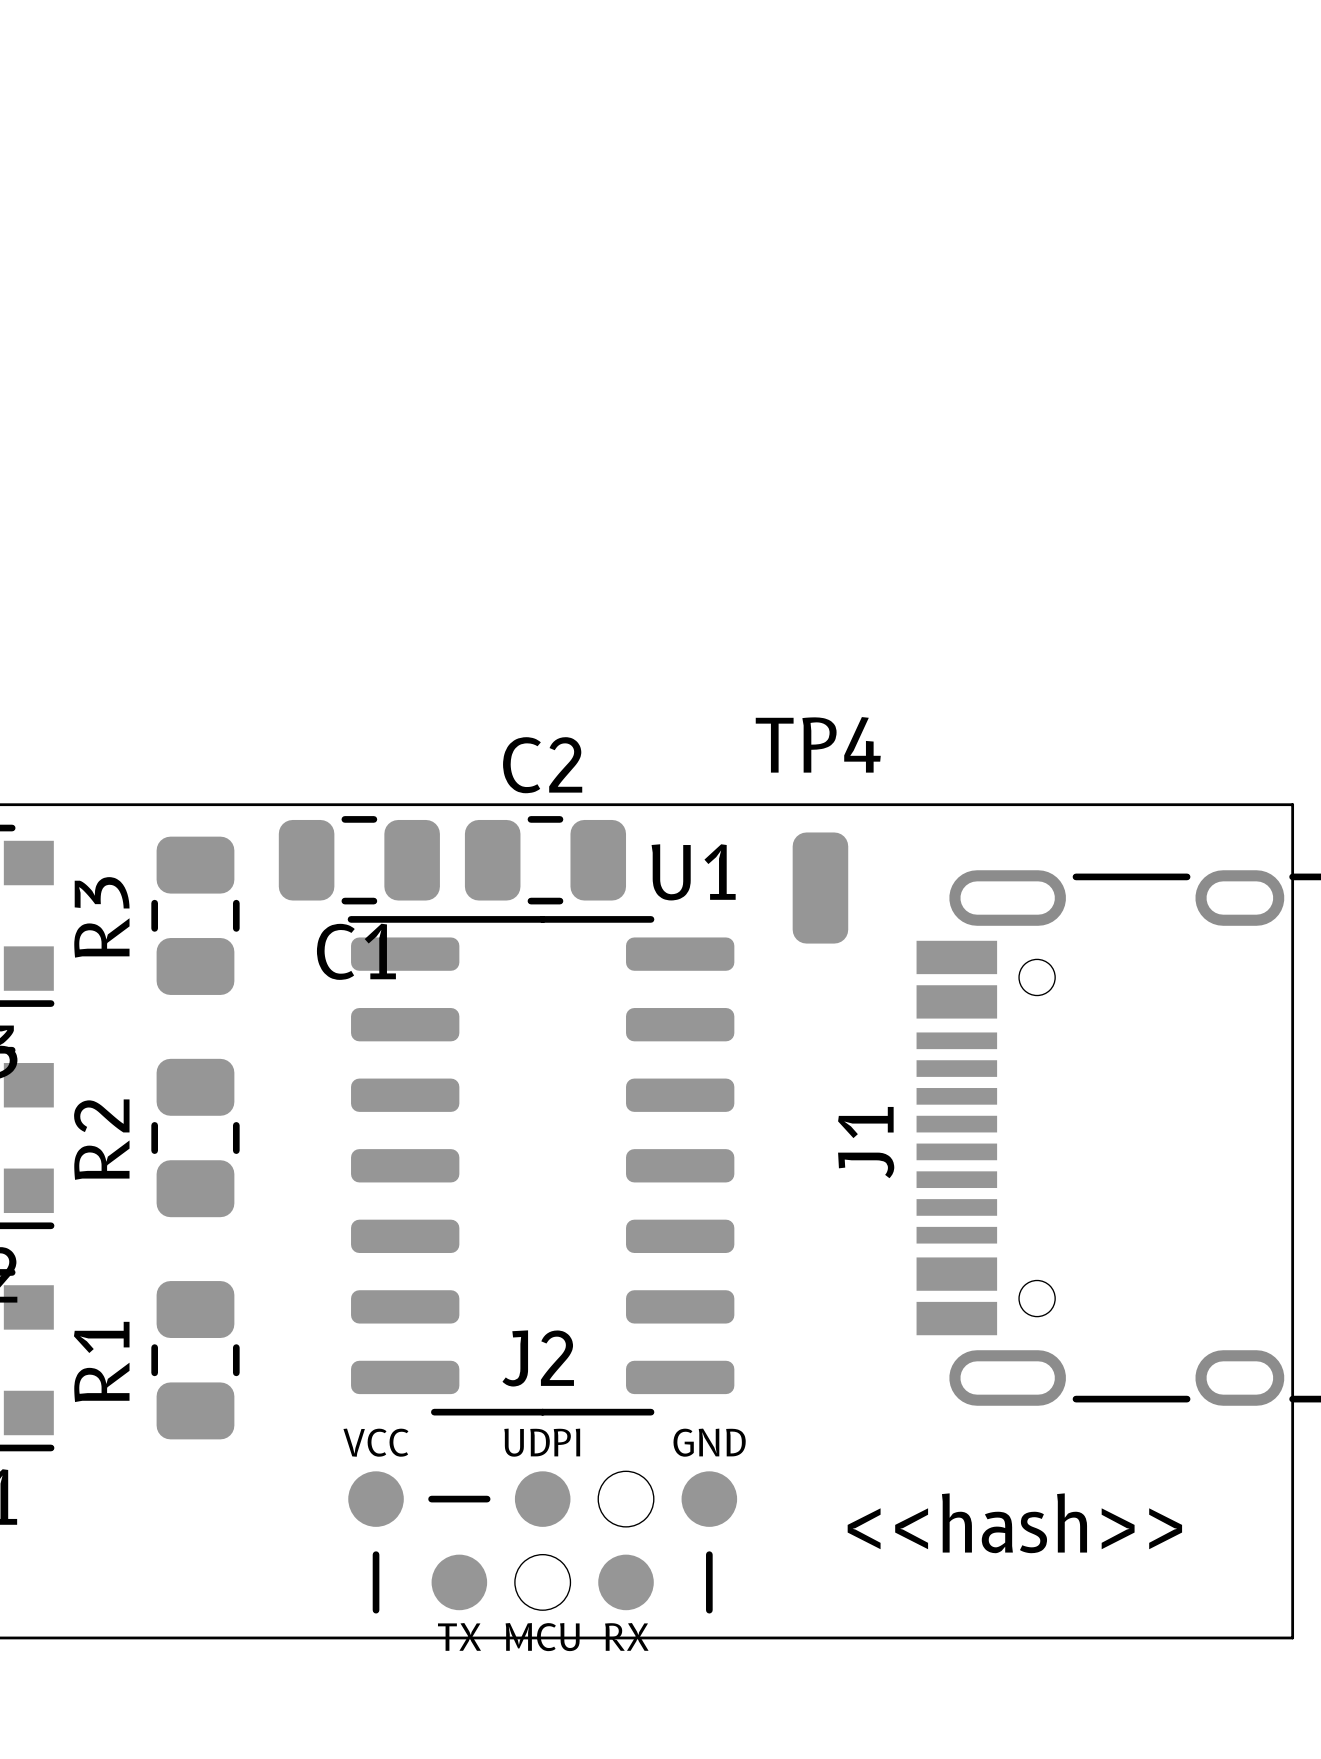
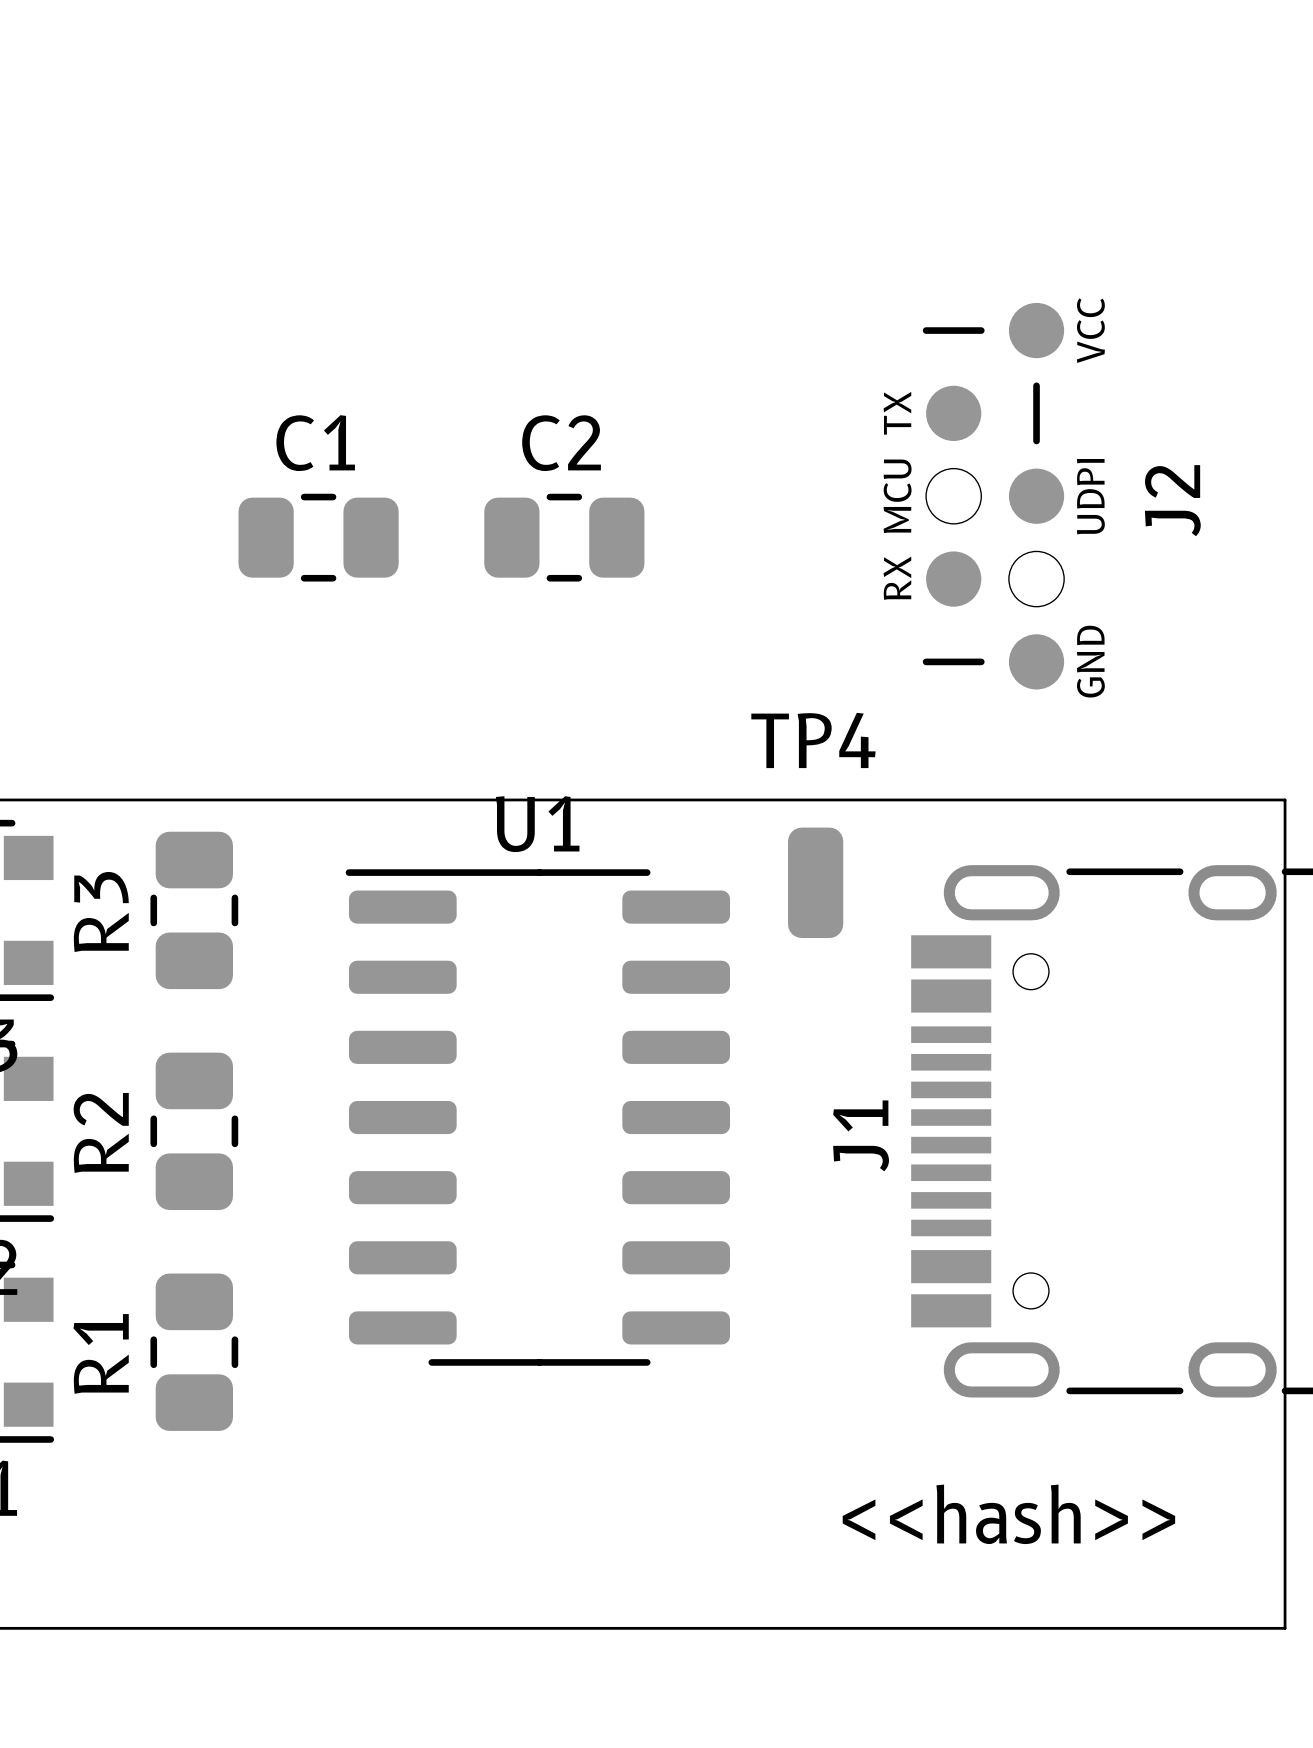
C1 position: (359, 860) -> (318, 537)
C2 position: (545, 860) -> (564, 537)
U1 name position: U1 (693, 872) -> U1 (537, 824)
C1 name position: C1 (356, 951) -> C1 (315, 443)
U1 position: (541, 1165) -> (537, 1117)
J2 rotation: 0° (542, 1542) -> 90° clockwise (993, 496)
J2 position: (542, 1542) -> (993, 496)

